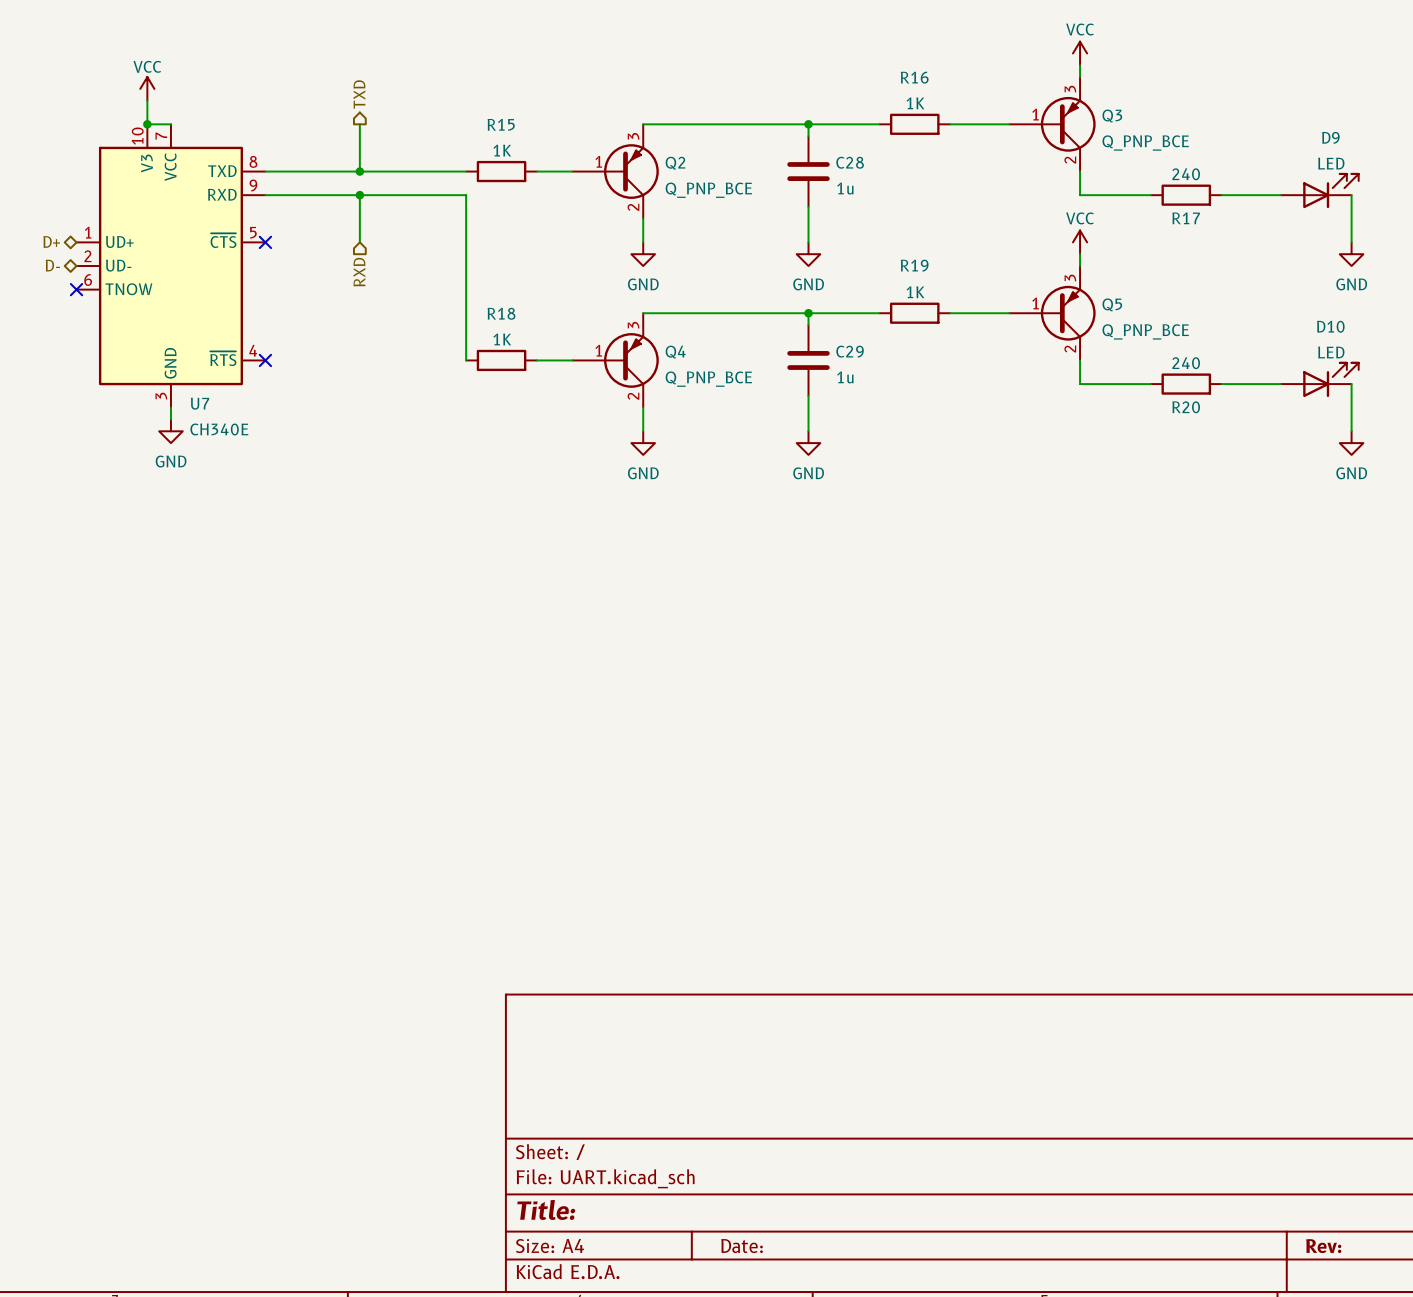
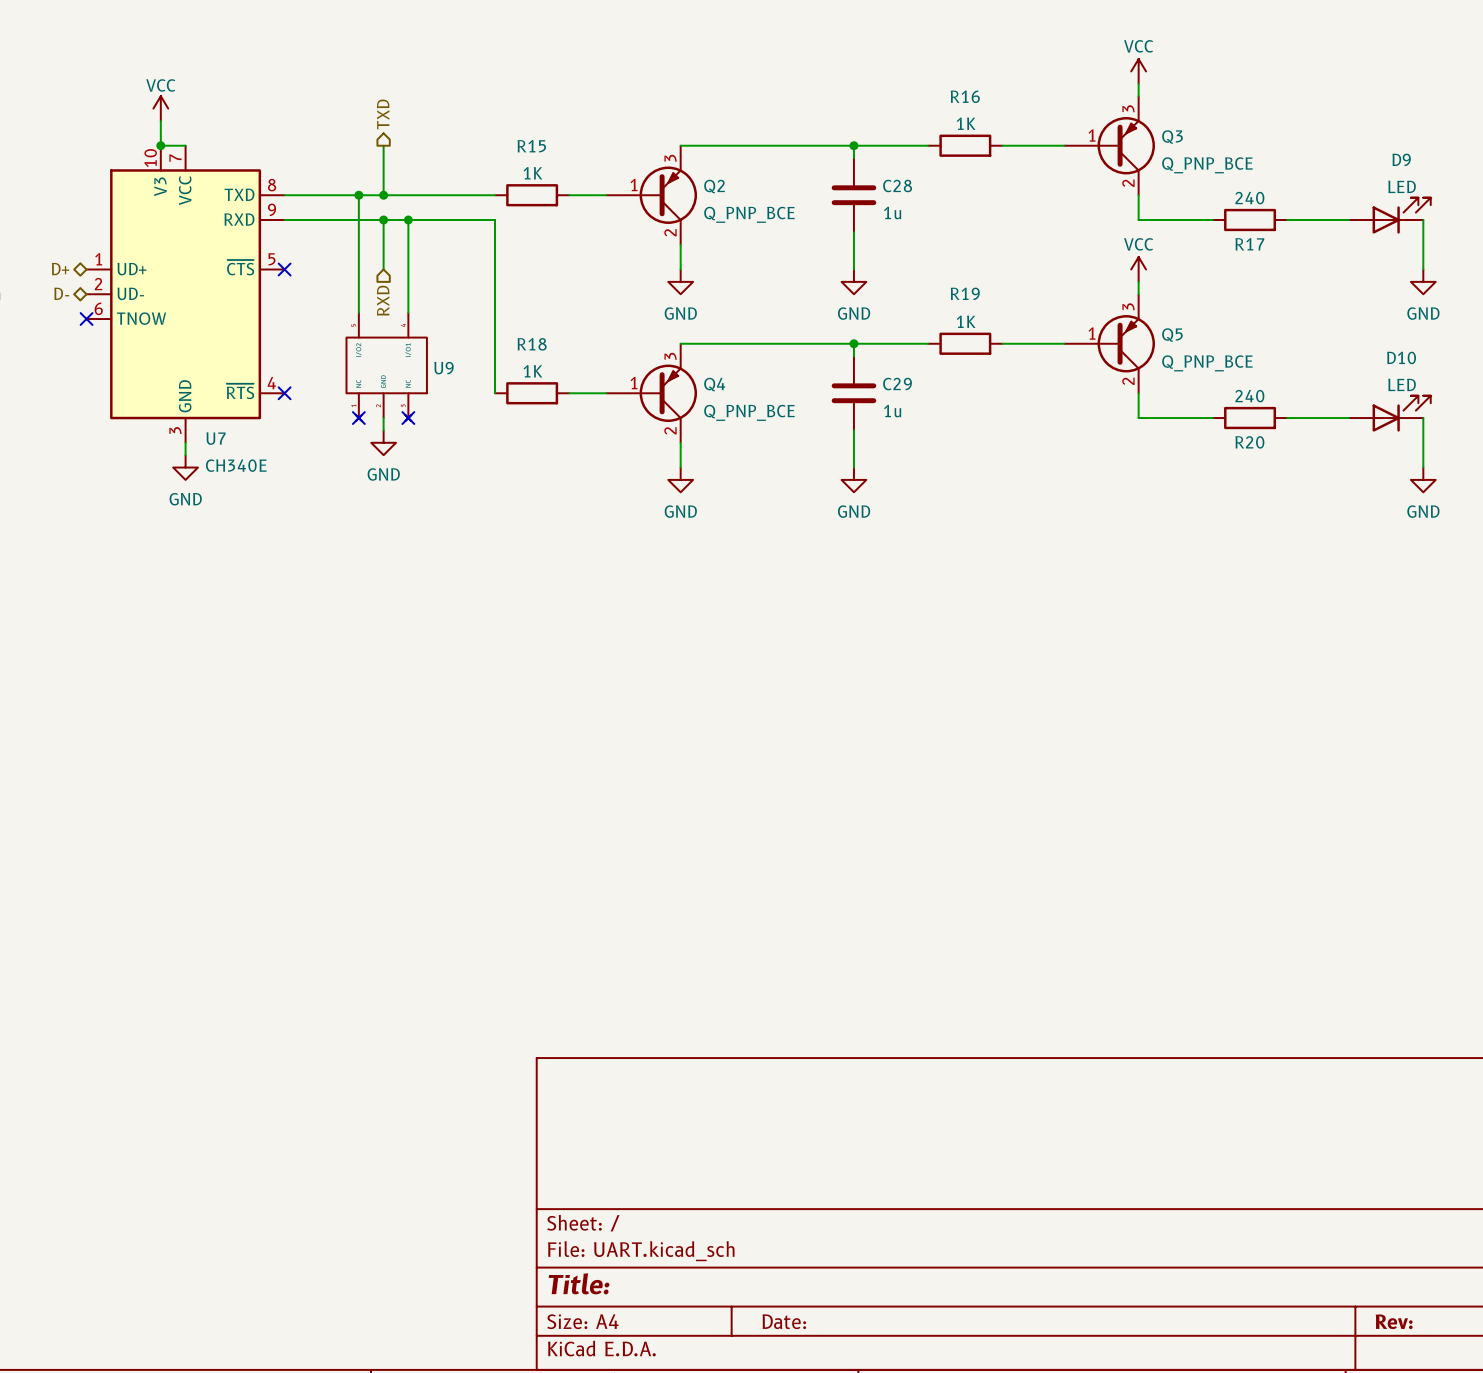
wire: none -> (358, 195) (358, 312)
junction: none -> (358, 195)
wire: none -> (408, 219) (408, 312)
junction: none -> (408, 219)
U9: none -> (386, 366)
no-connect mark: none -> (358, 418)
wire: none -> (383, 418) (383, 430)
no-connect mark: none -> (408, 418)
power symbol: none -> GND (383, 442)

